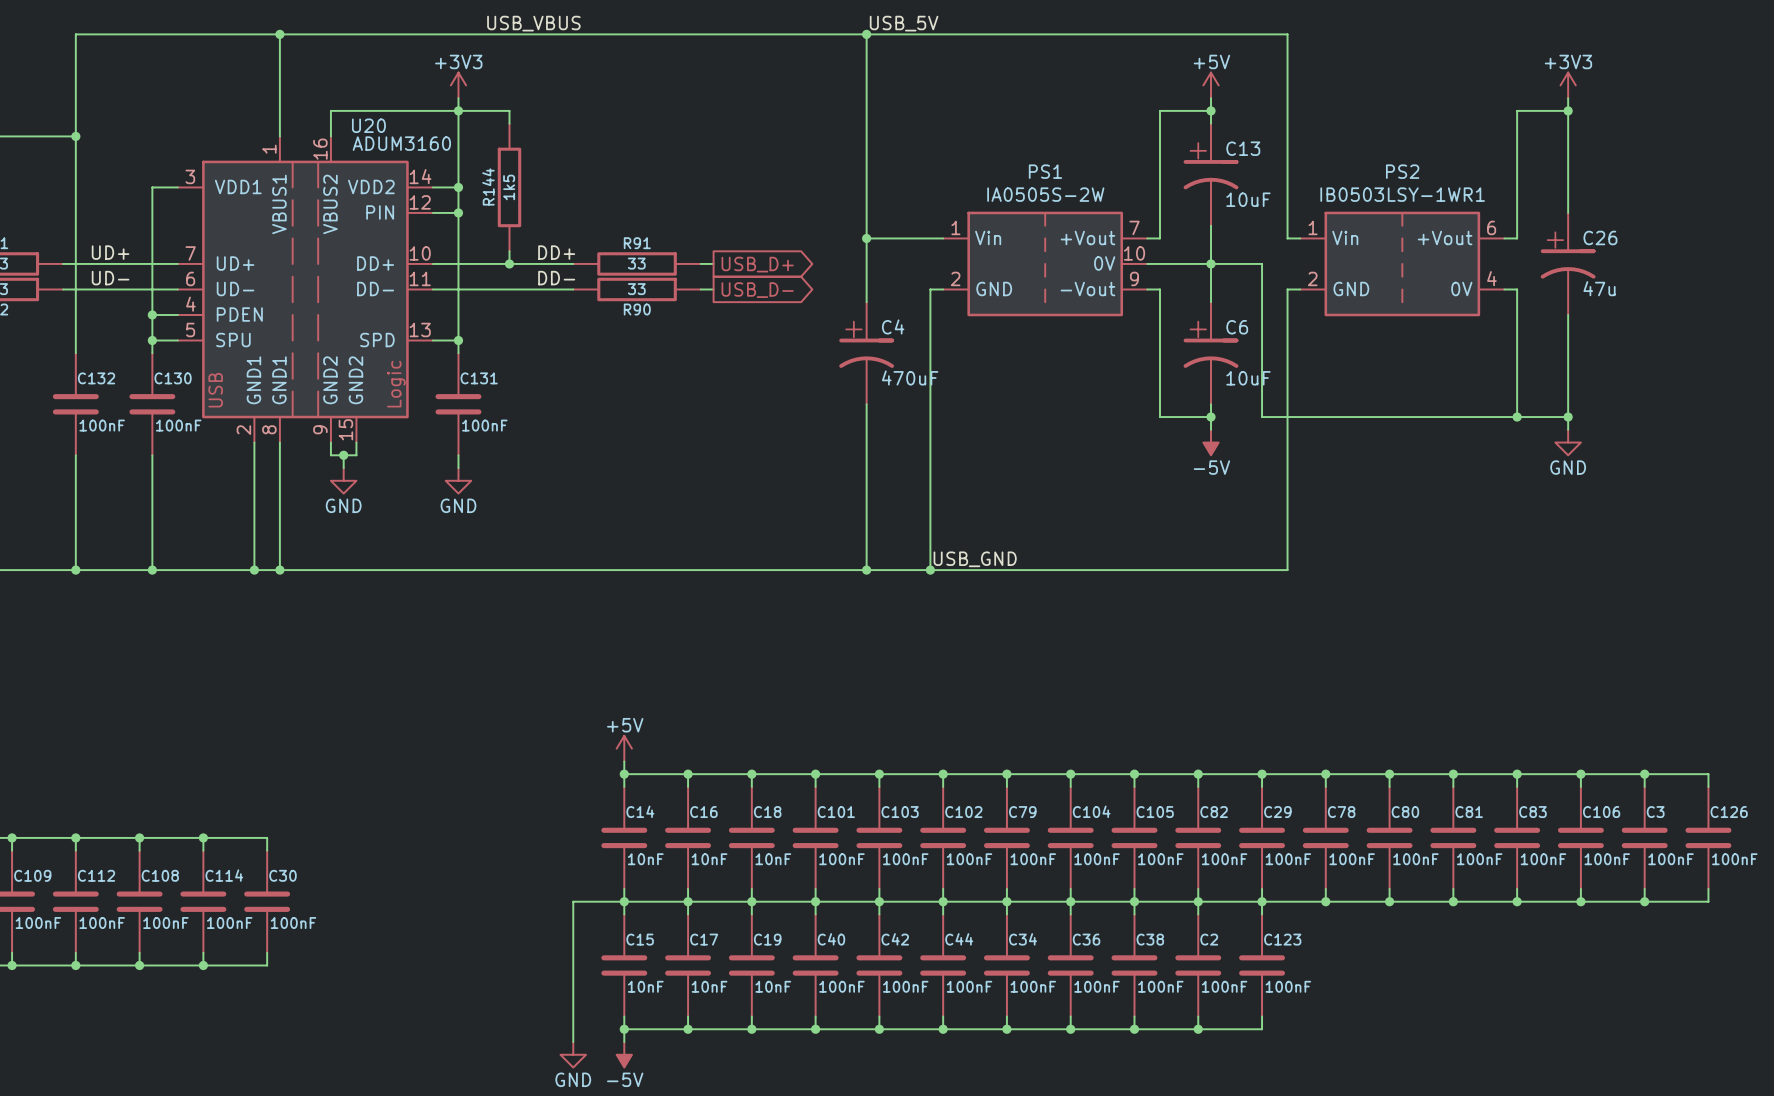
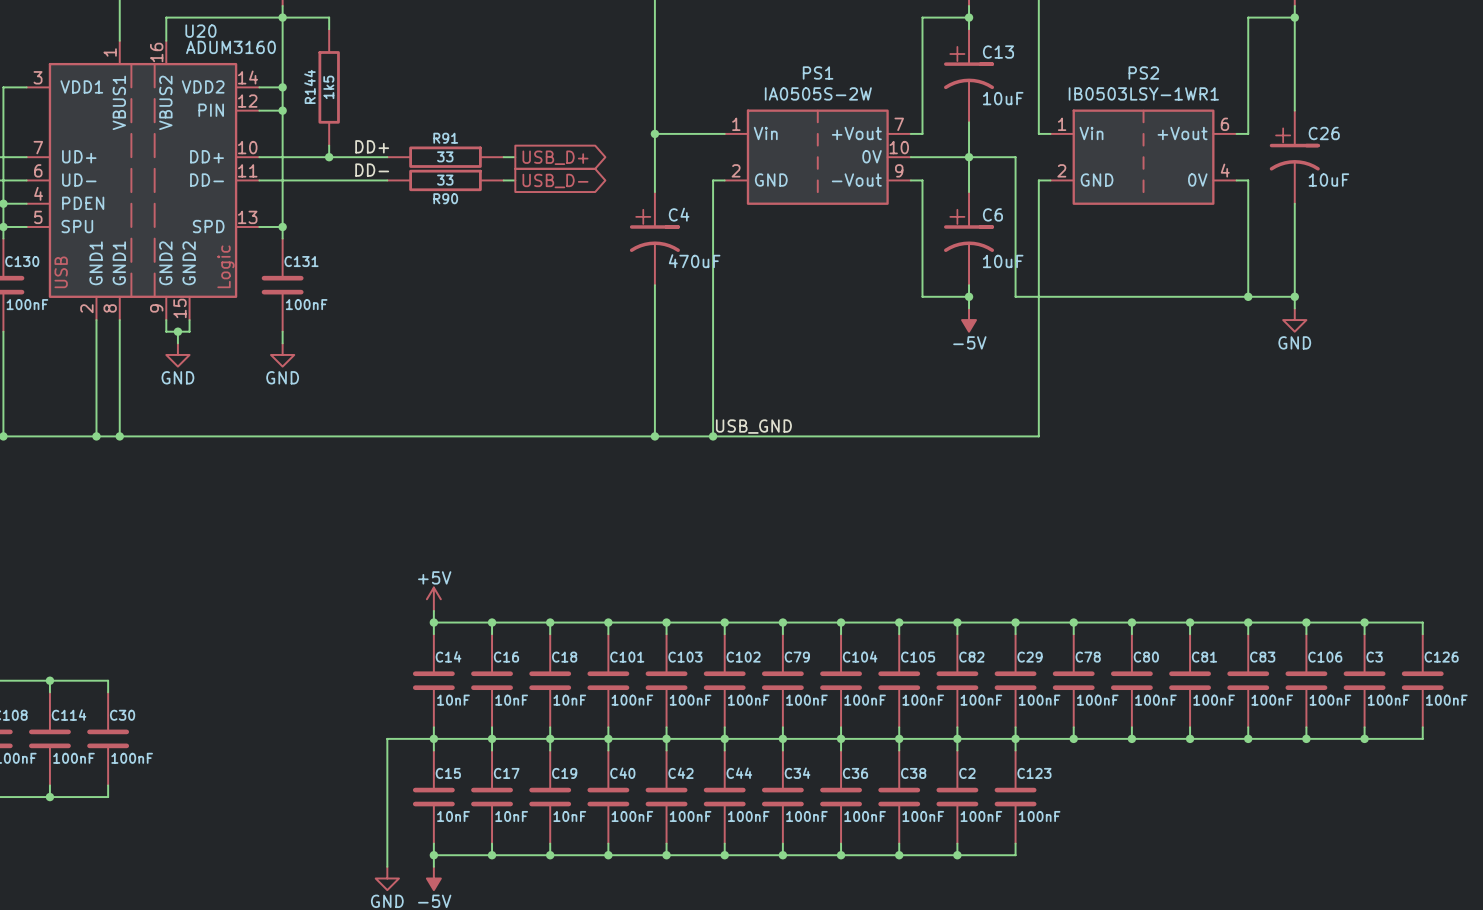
C26 value: 47u (1599, 288) -> 10uF (1328, 180)

